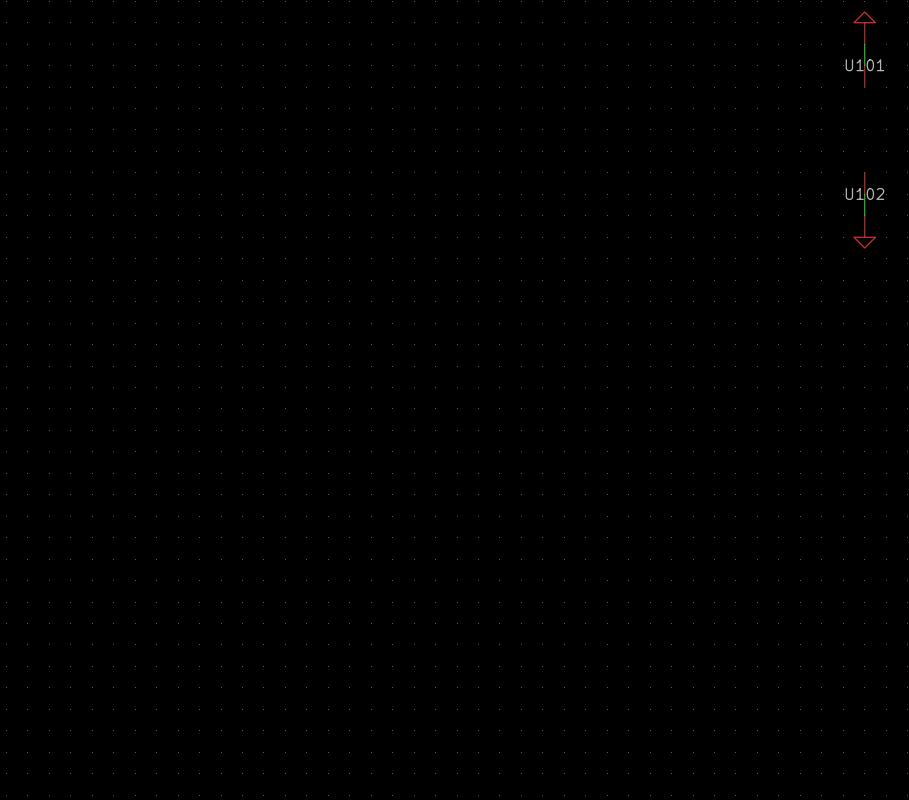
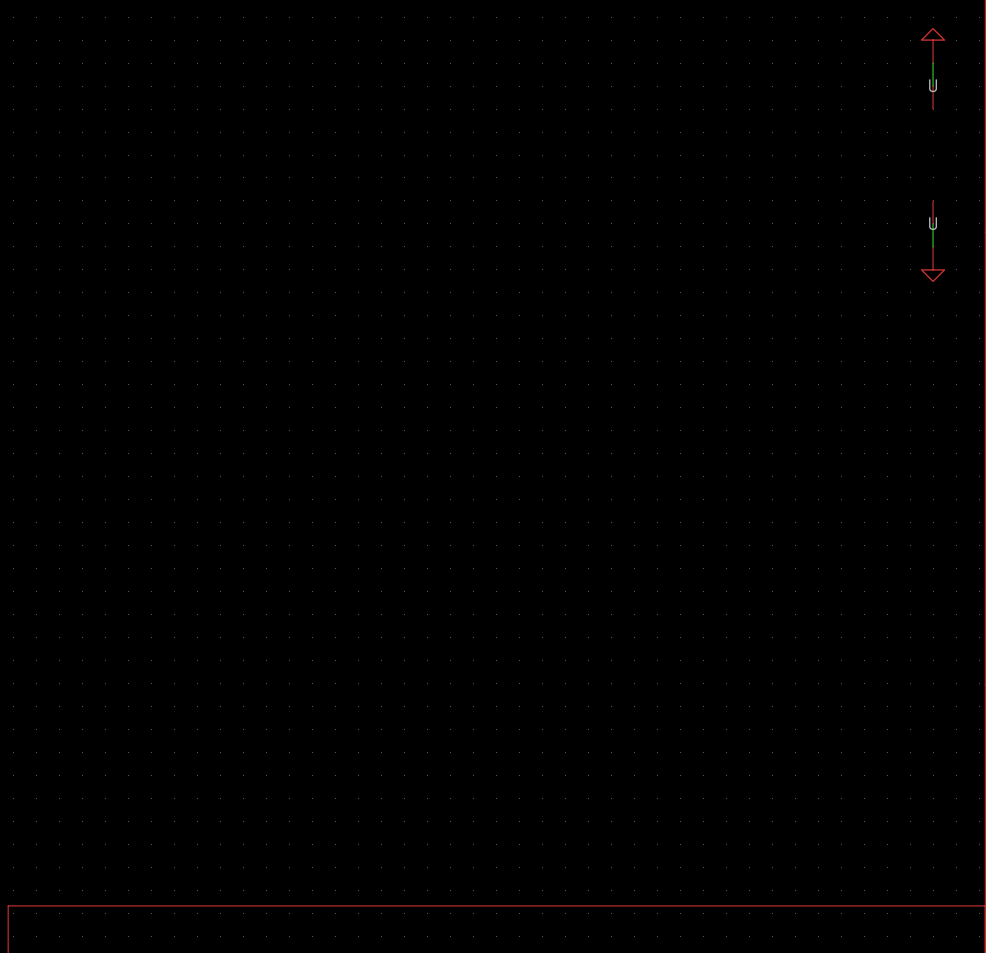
U101 name: U101 (864, 65) -> U (933, 85)
U102 name: U102 (864, 193) -> U (933, 223)

